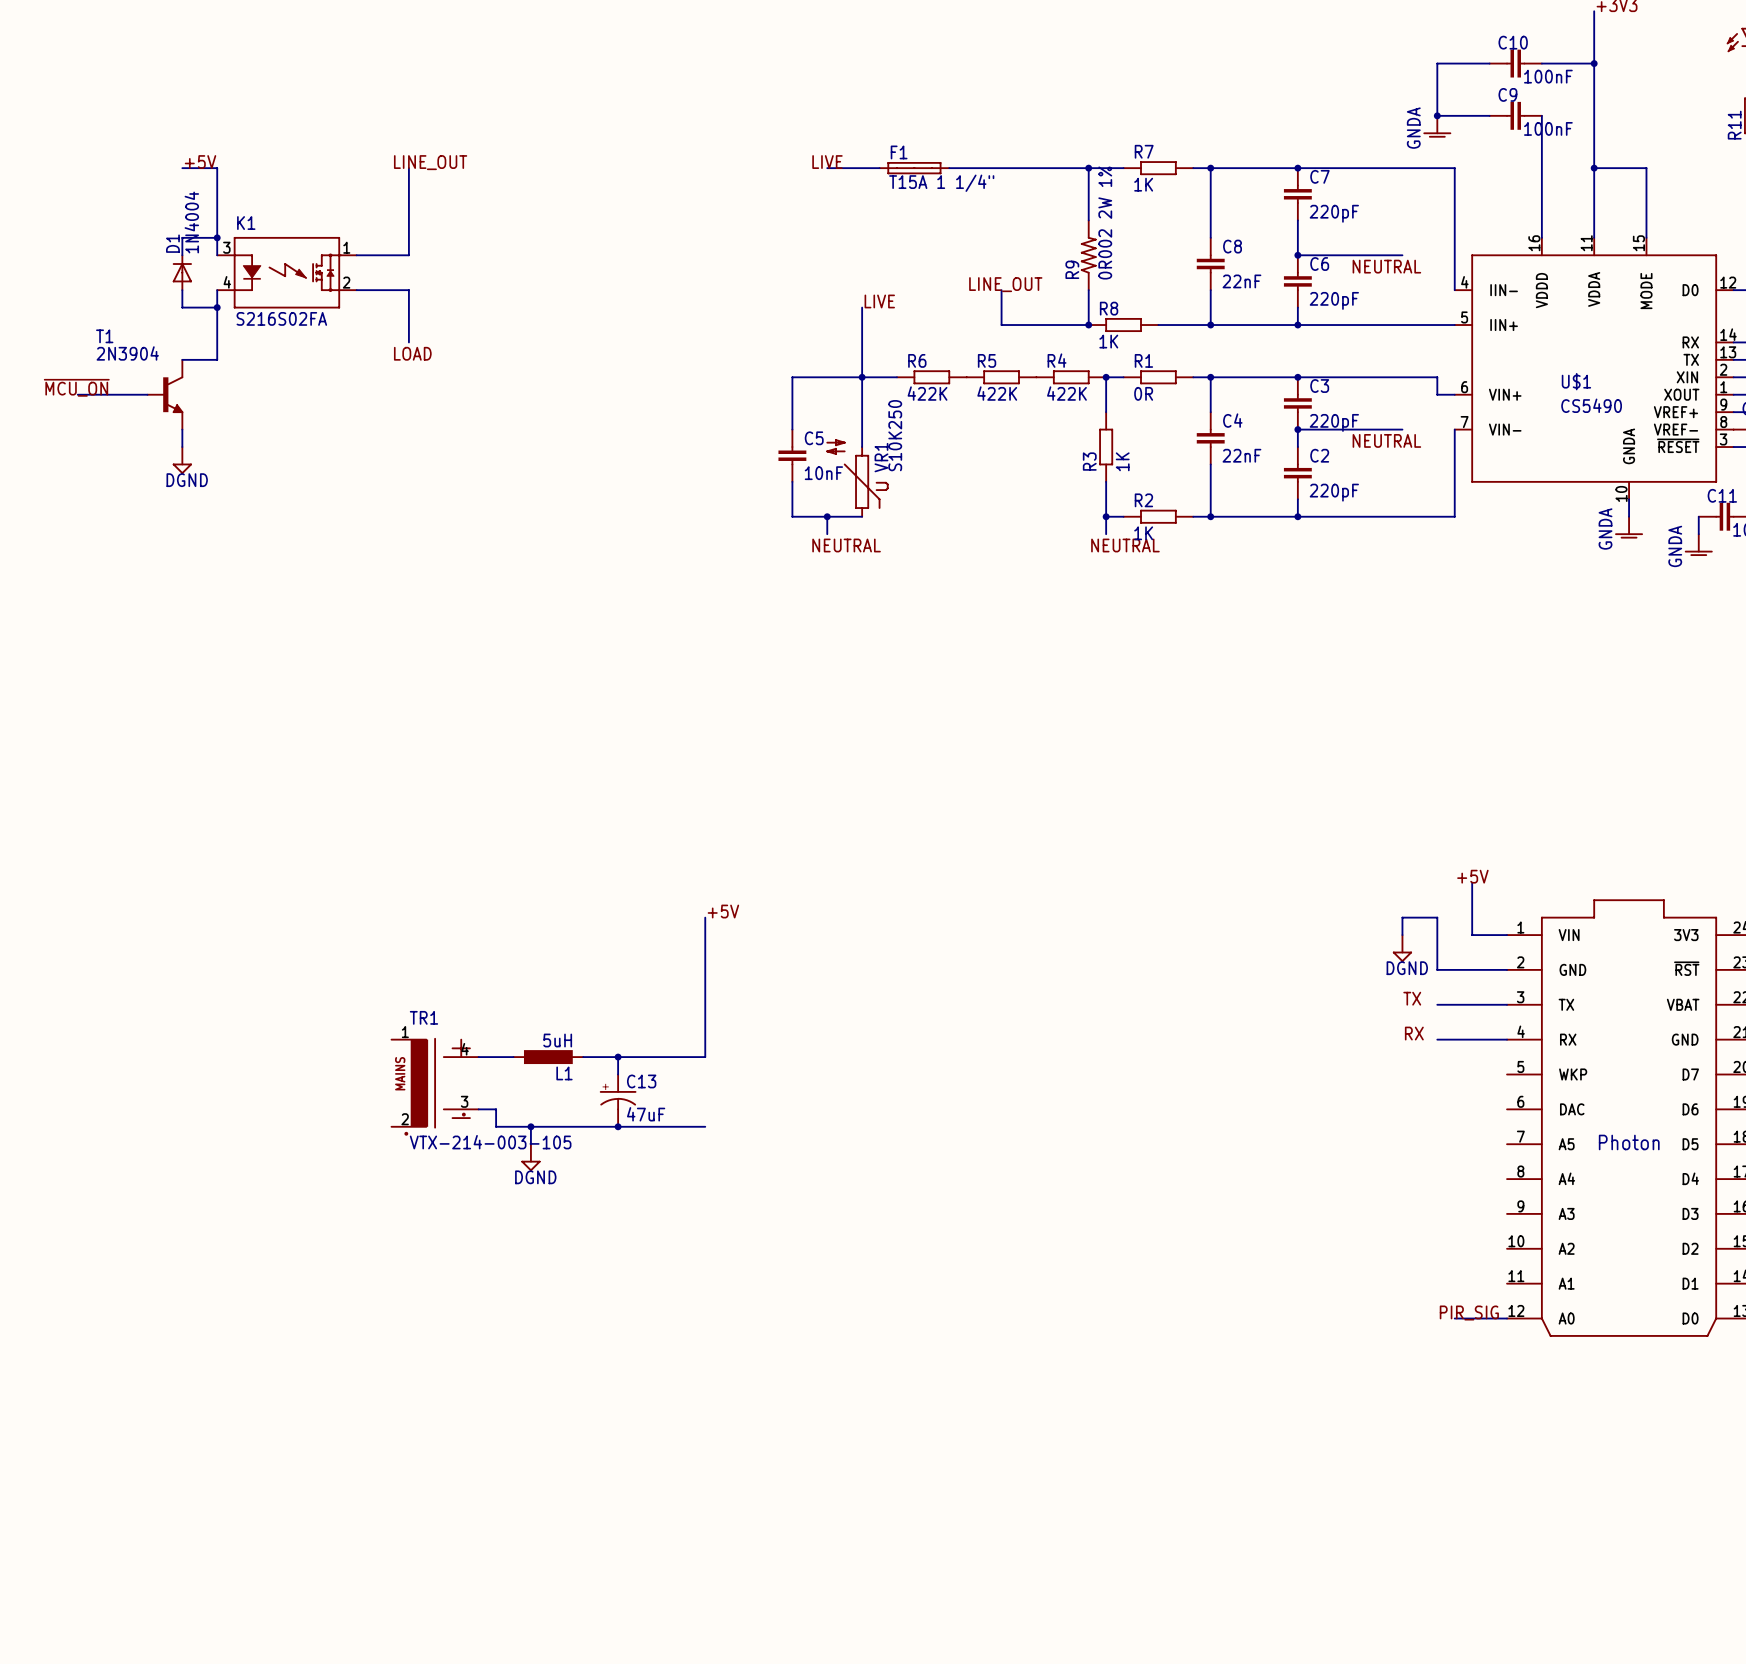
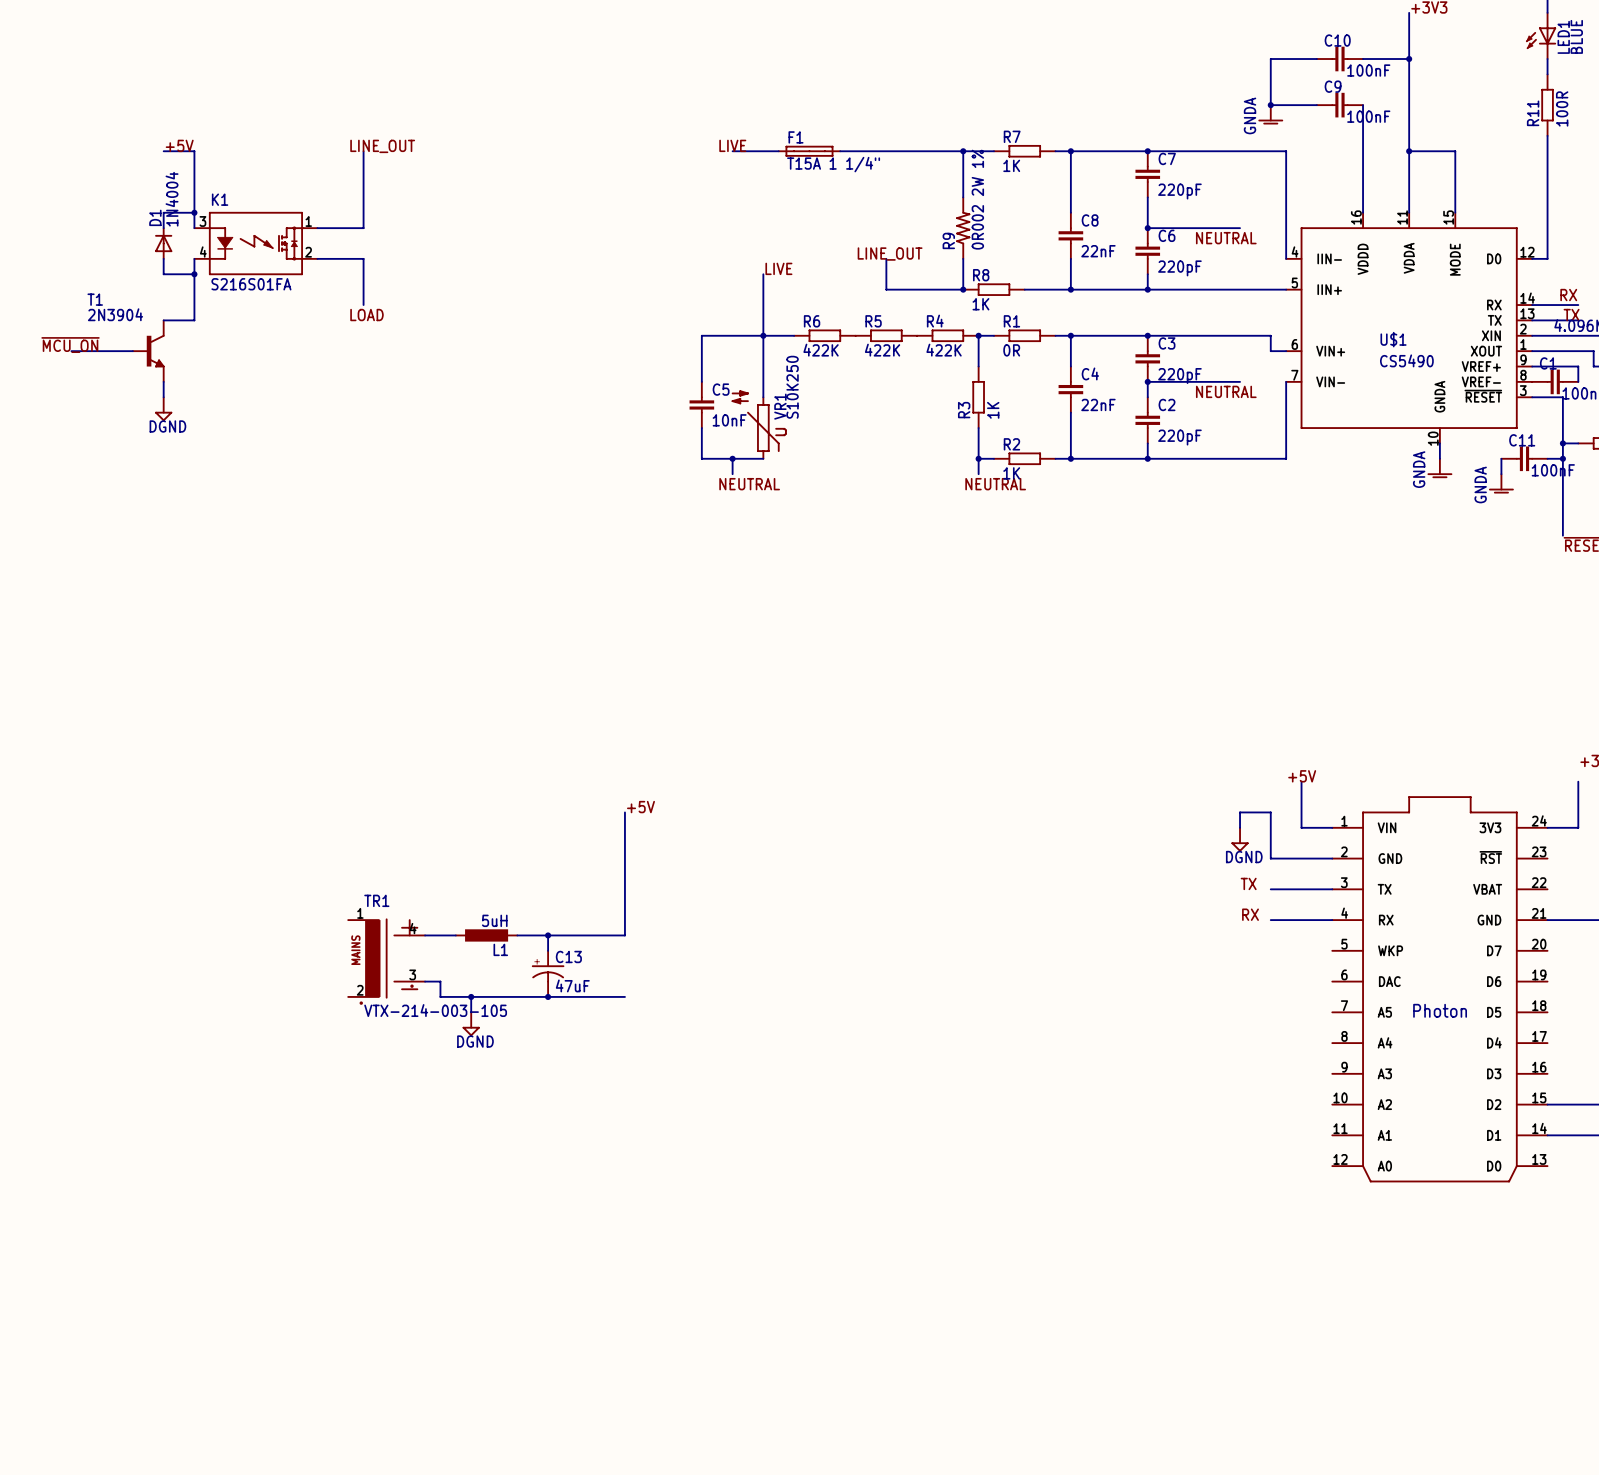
K1 value: S216S02FA (281, 318) -> S216S01FA (251, 284)
label: PIR_SIG (1469, 1313) -> none
wire: (1454, 1318) (1507, 1318) -> none

